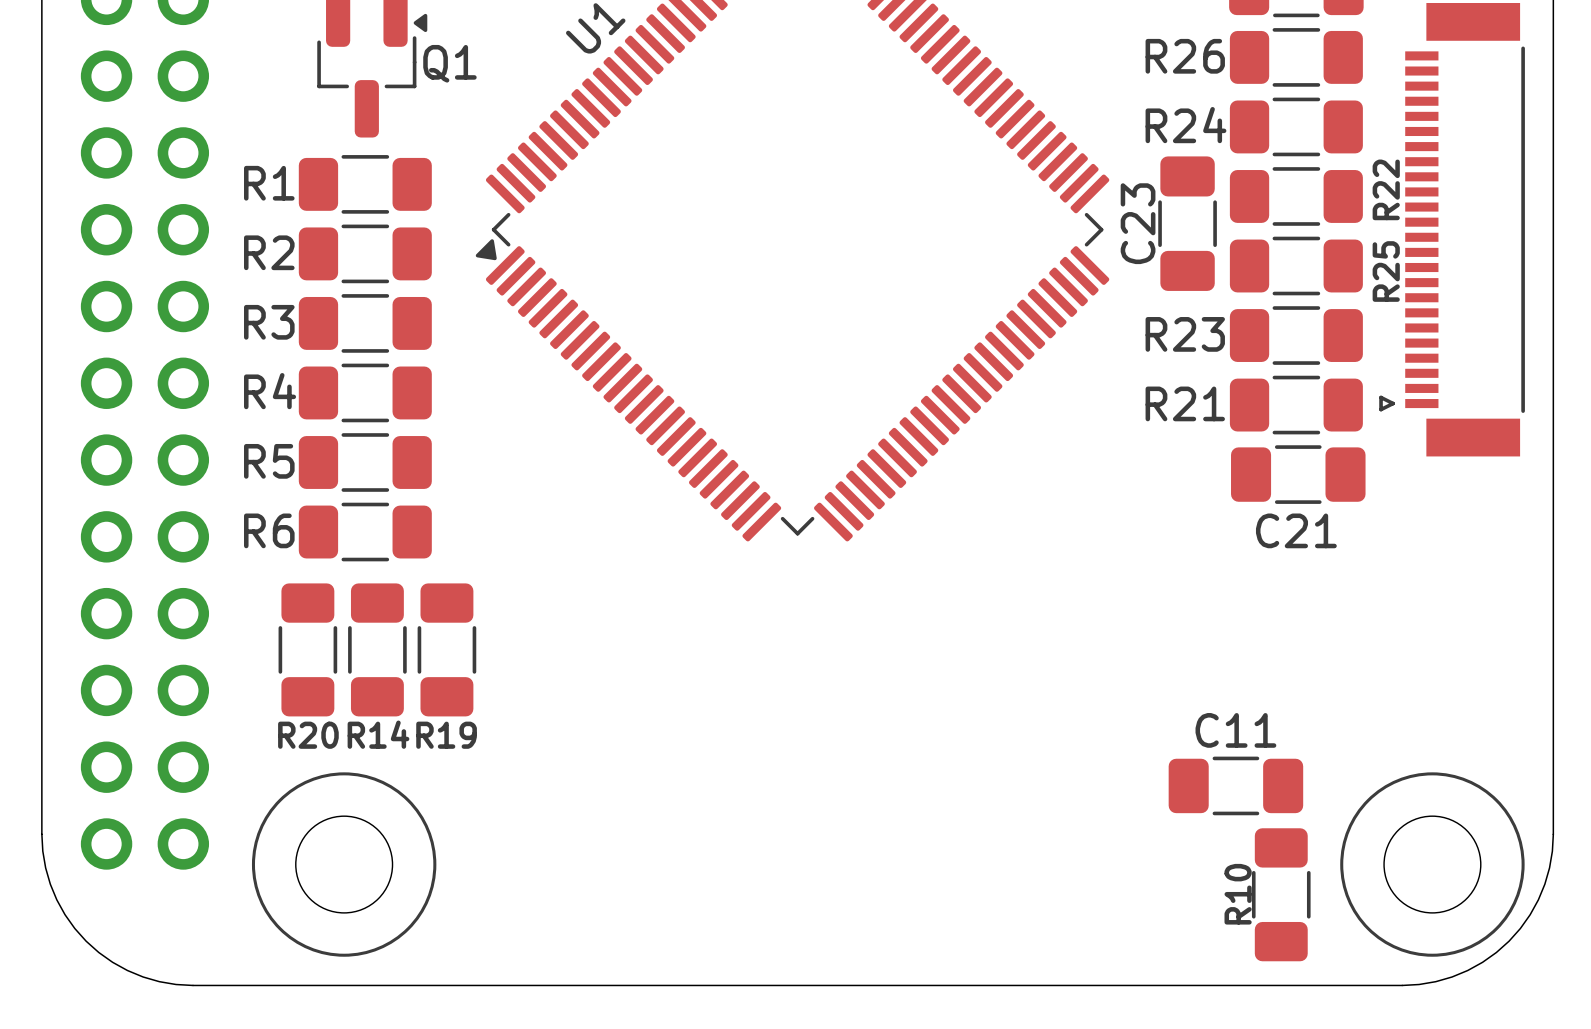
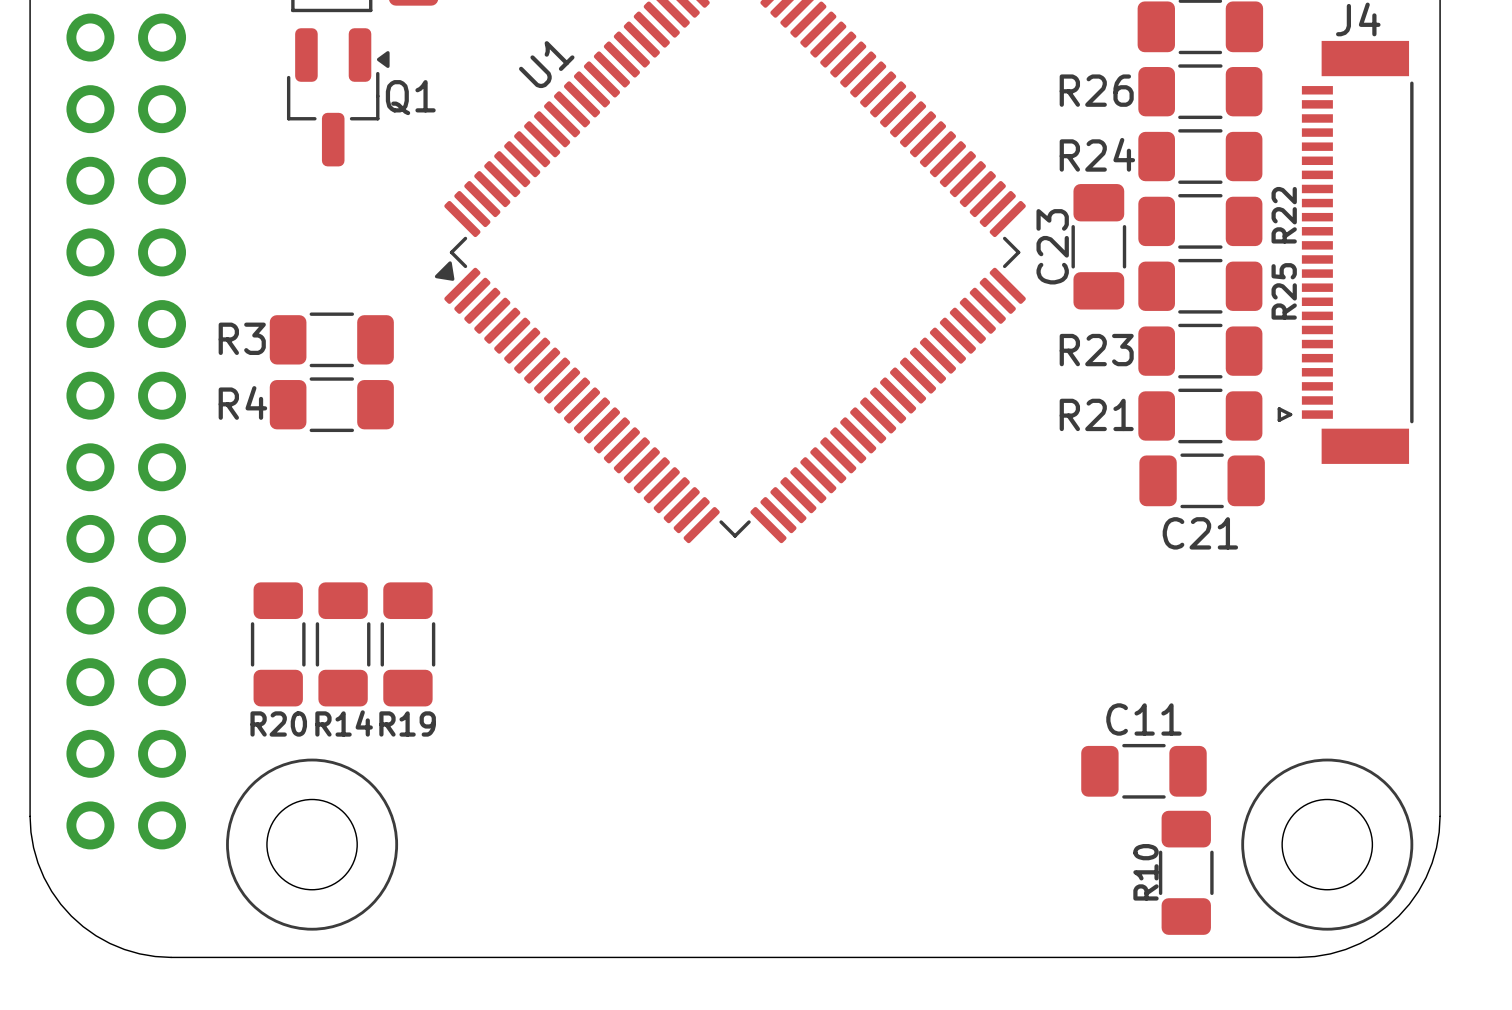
R1: (365, 184) -> none
R2: (365, 253) -> none
R5: (365, 462) -> none
R6: (365, 532) -> none

